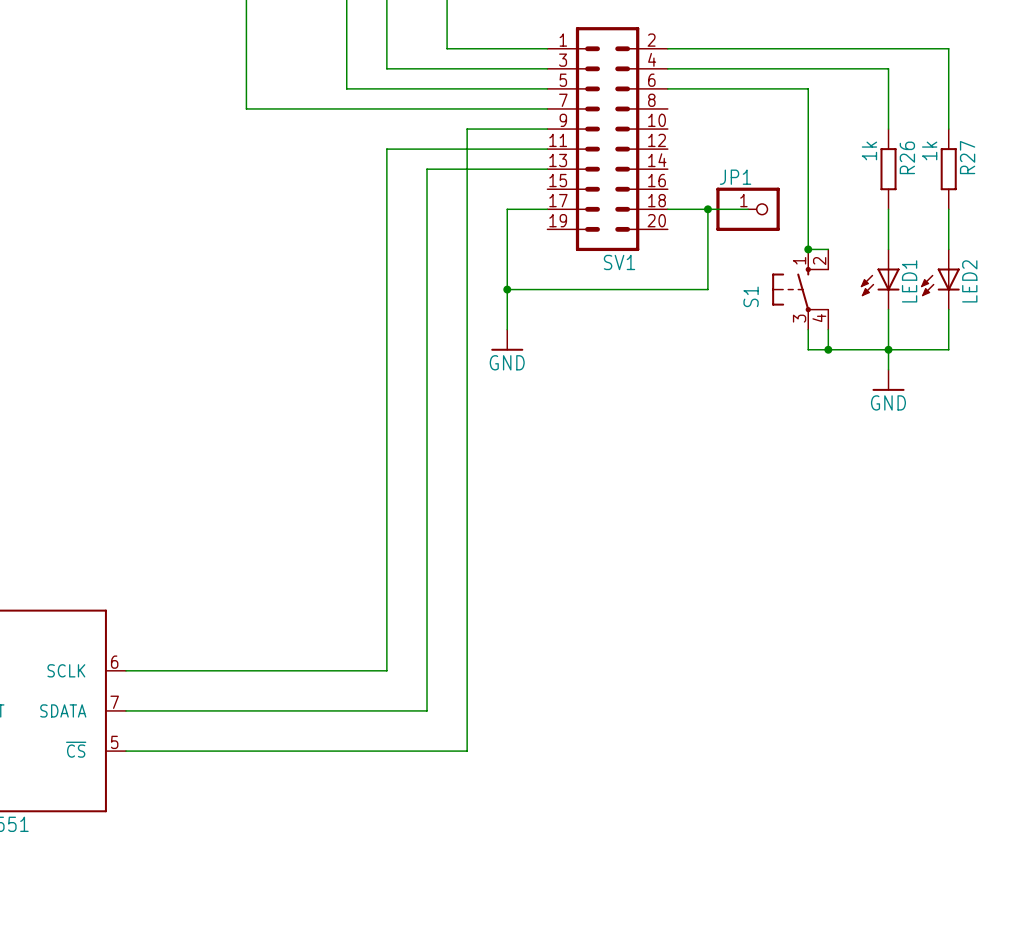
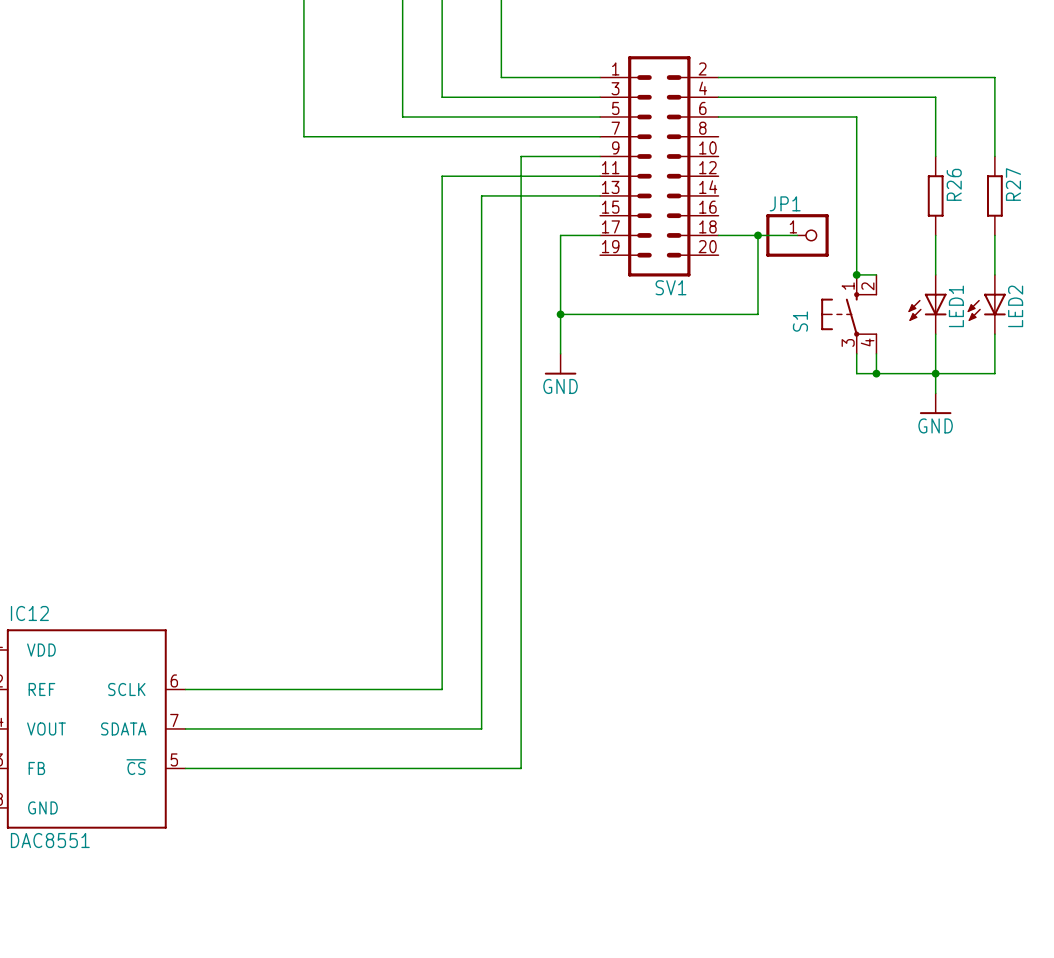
R26 value: 1k (869, 150) -> none
R27 value: 1k (929, 150) -> none

